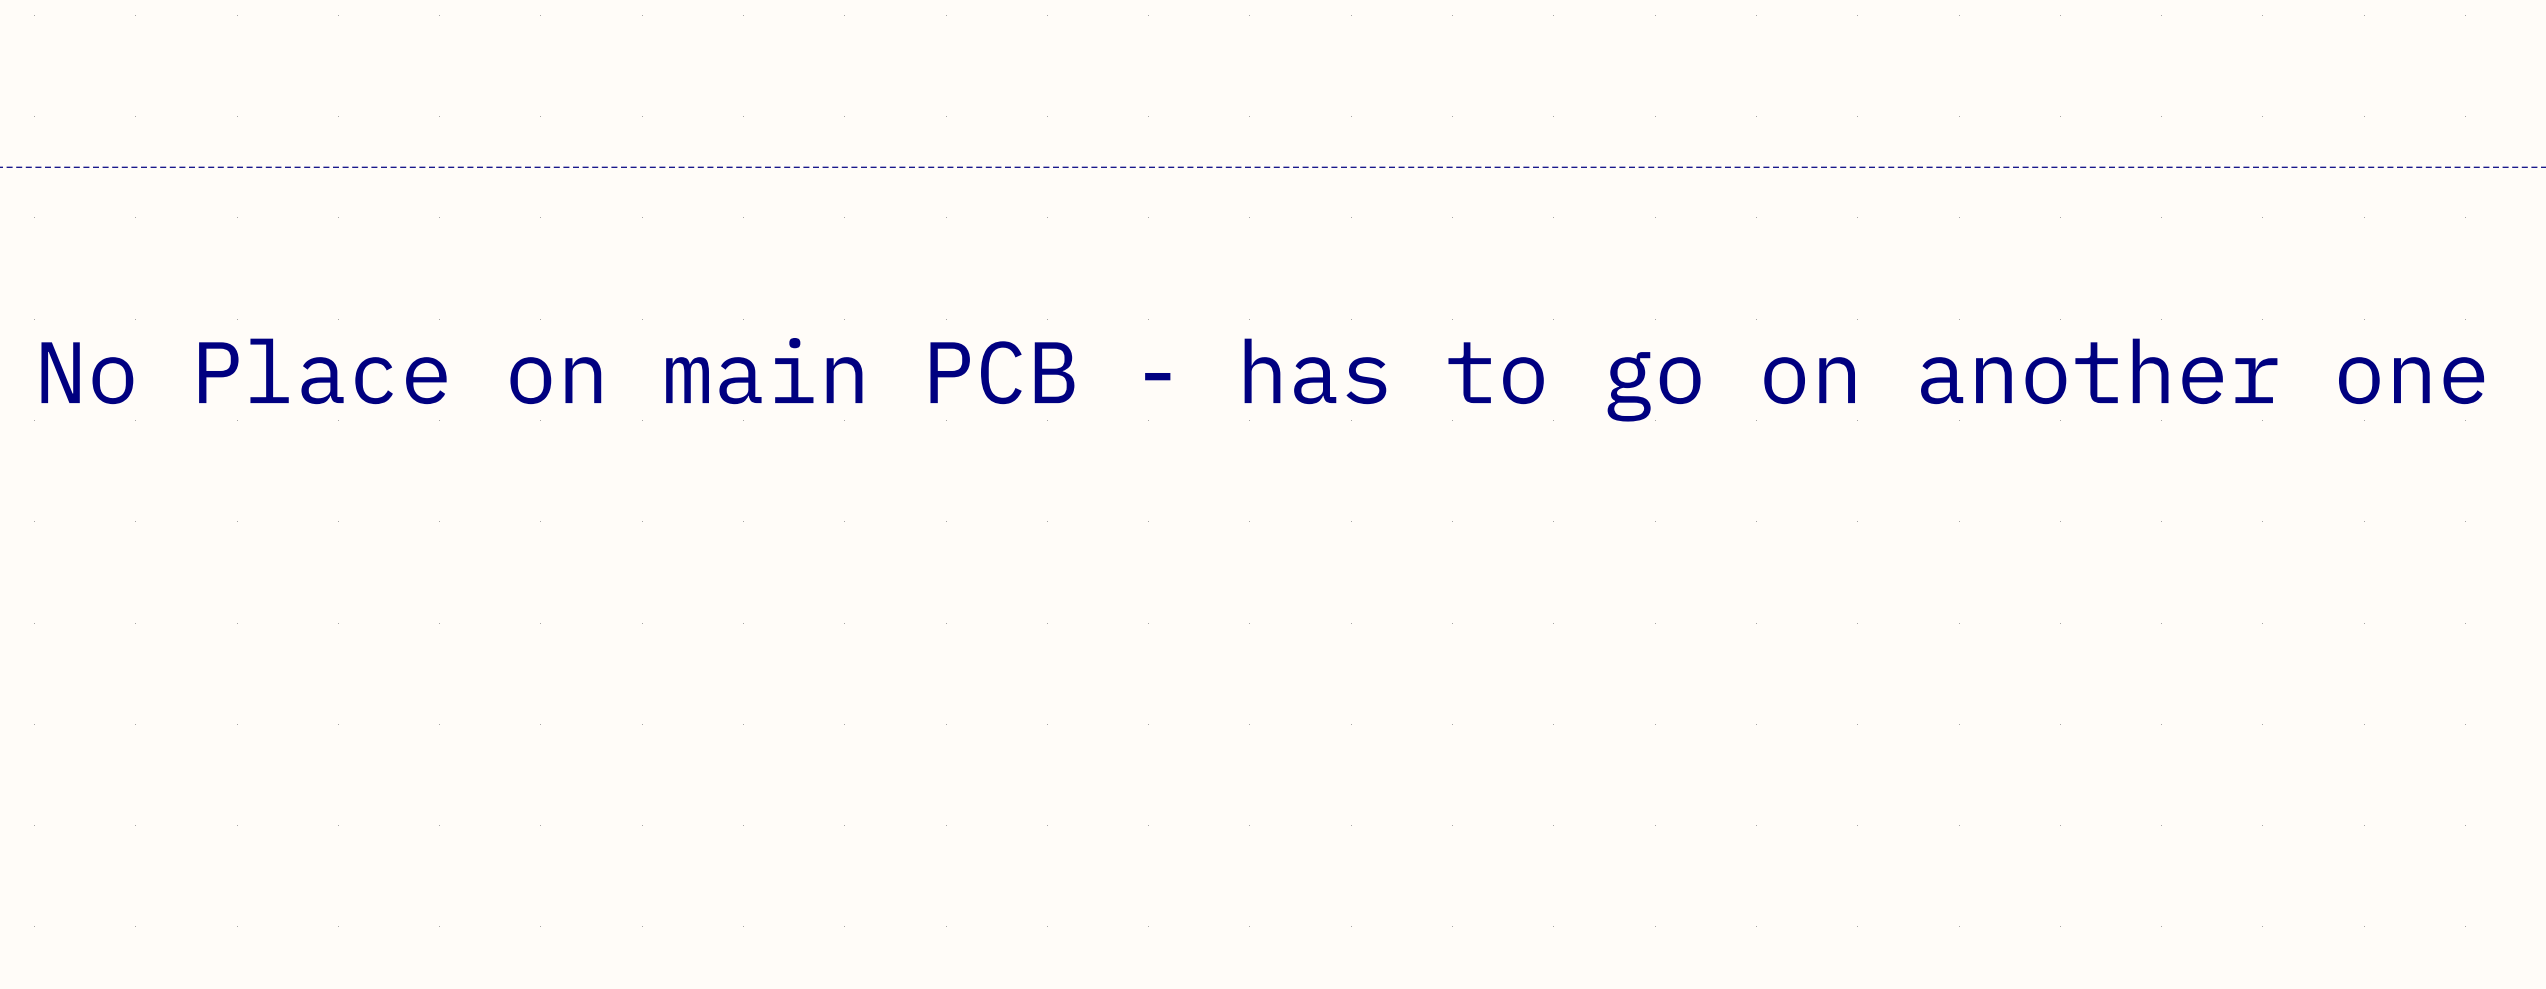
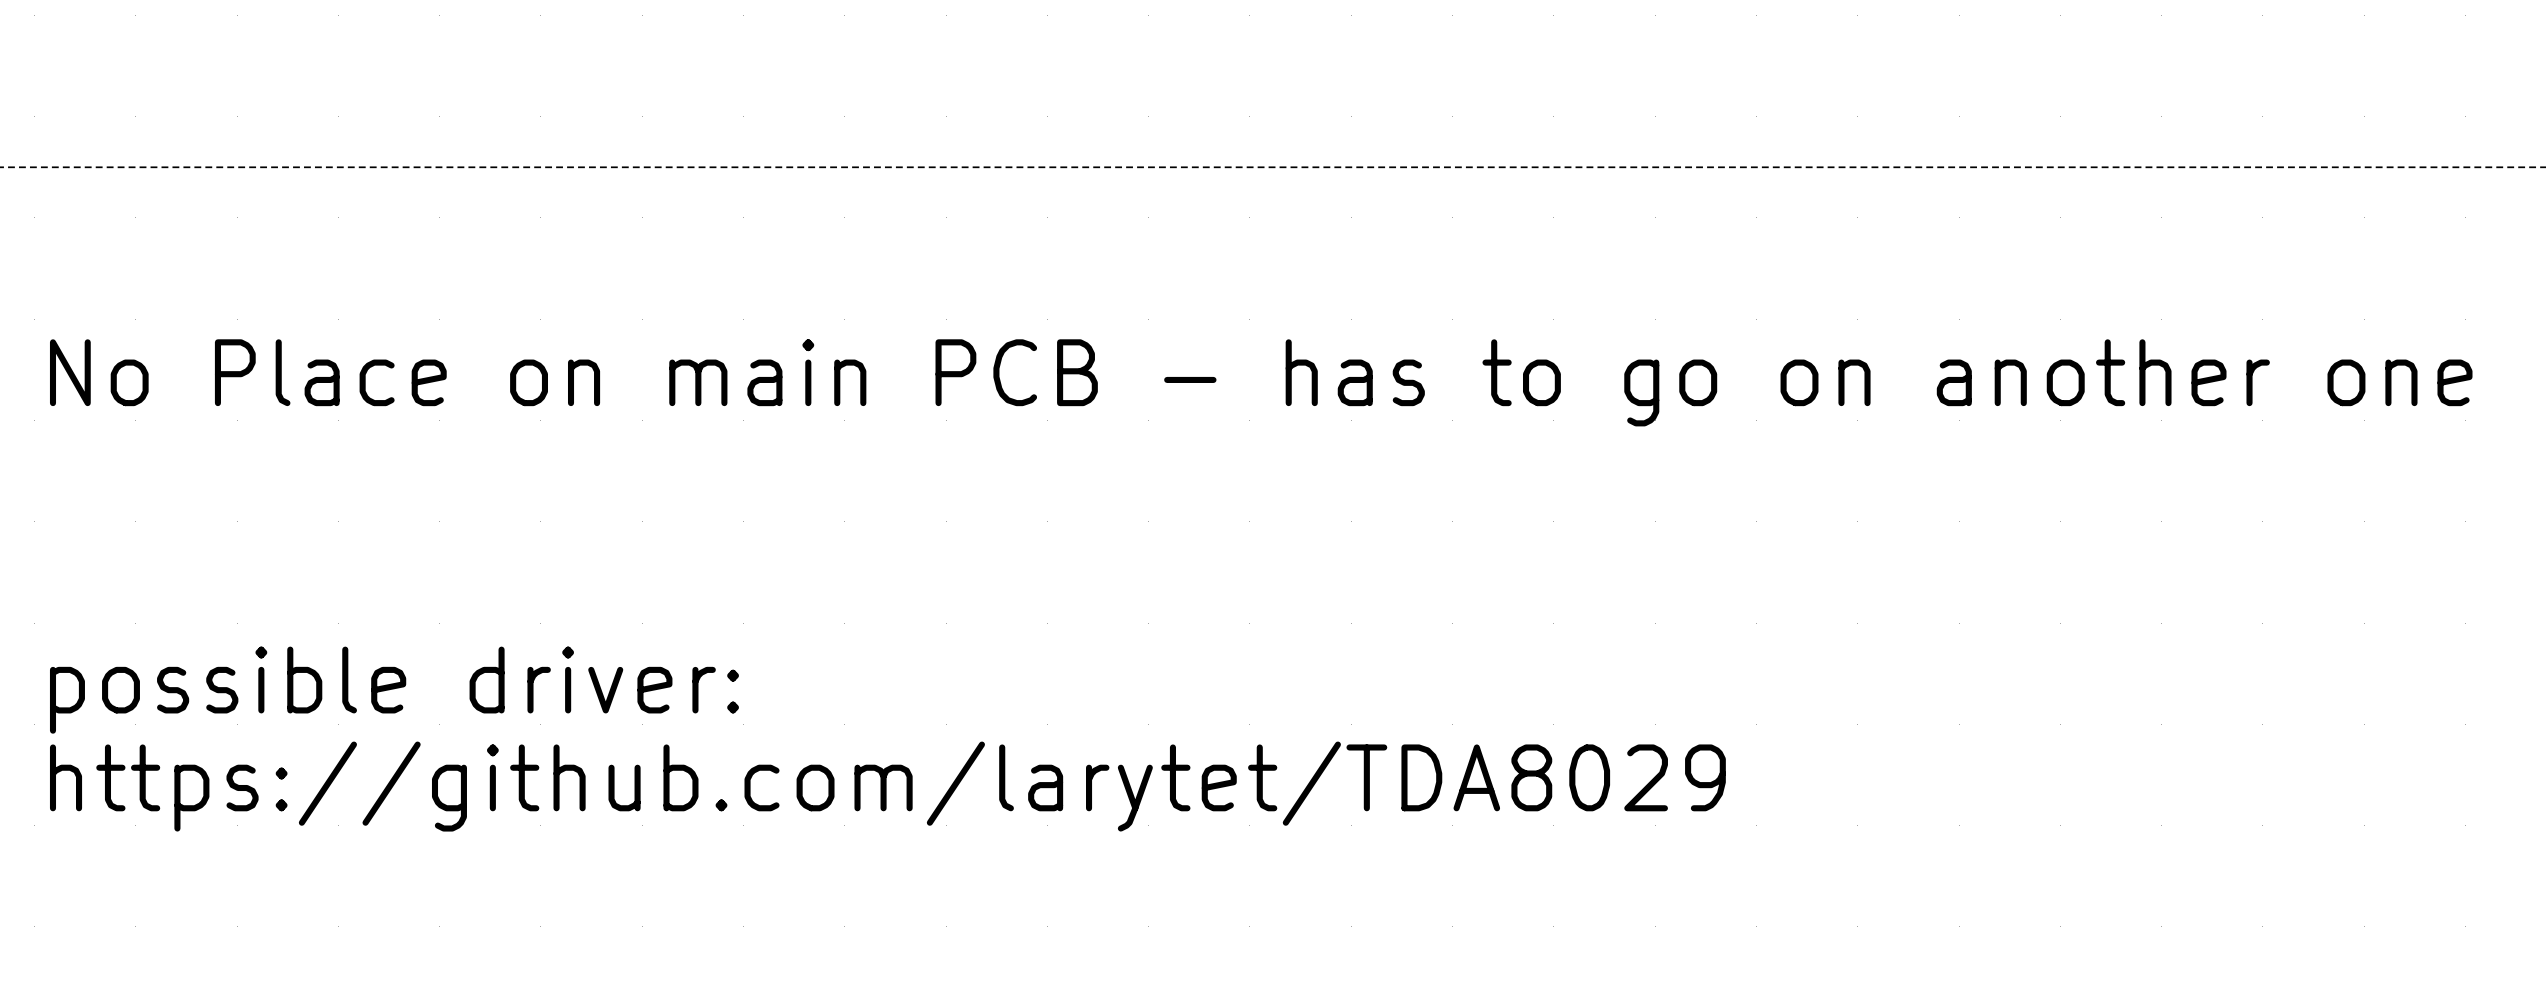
text: none -> possible driver: (394, 690)
text: none -> https://github.com/larytet/TDA8029 (887, 786)

